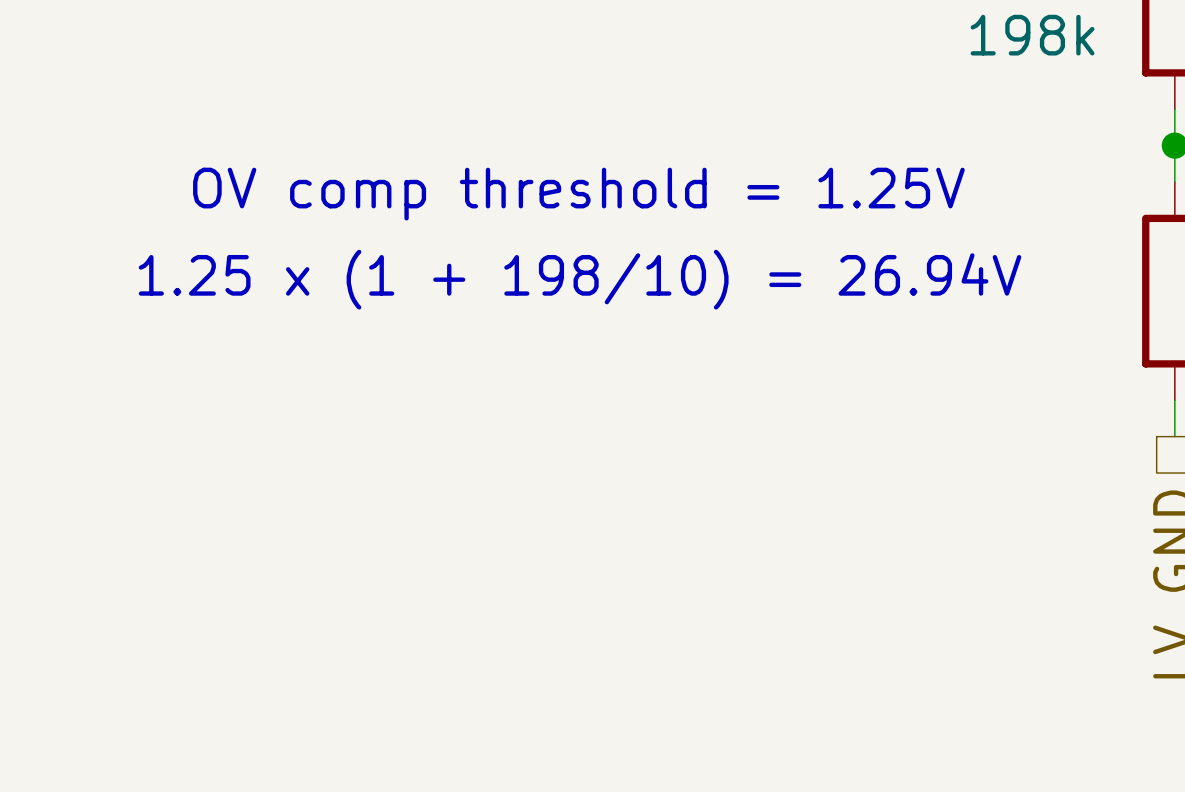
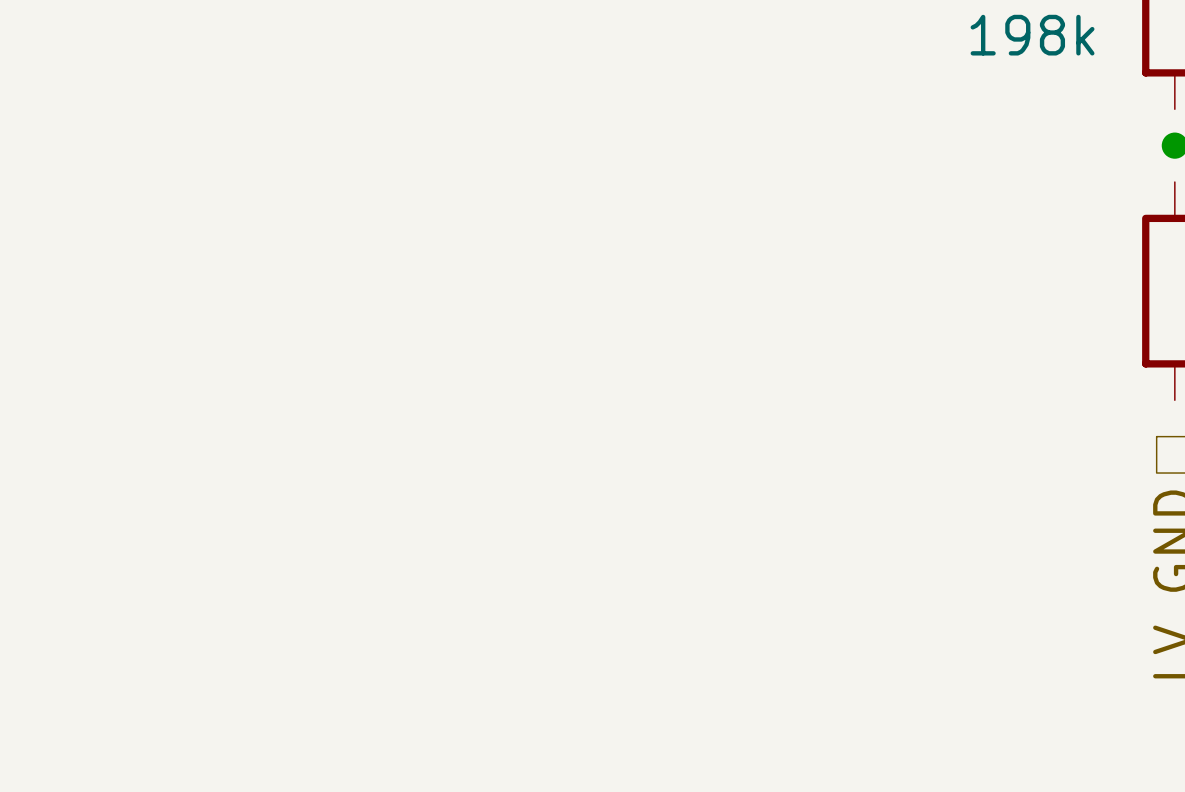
wire: (1174, 109) (1174, 182) -> none
text: OV comp threshold = 1.25V (578, 194) -> none
text: 1.25 x (1 + 198/10) = 26.94V (580, 279) -> none
wire: (1174, 400) (1174, 436) -> none

